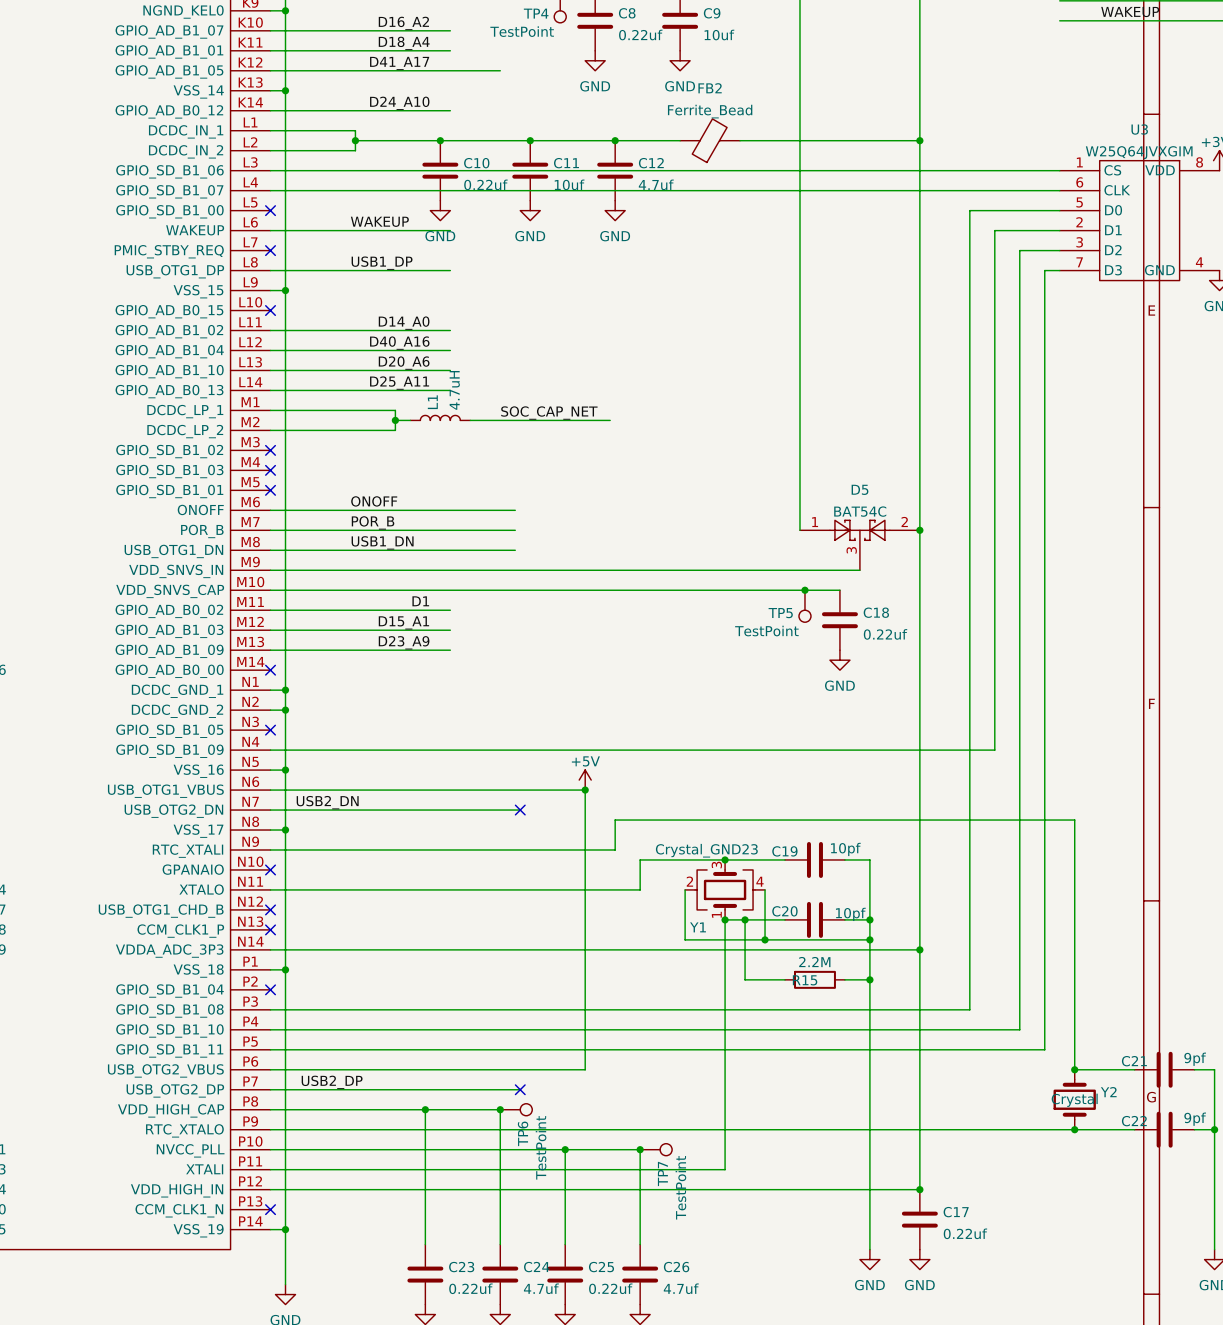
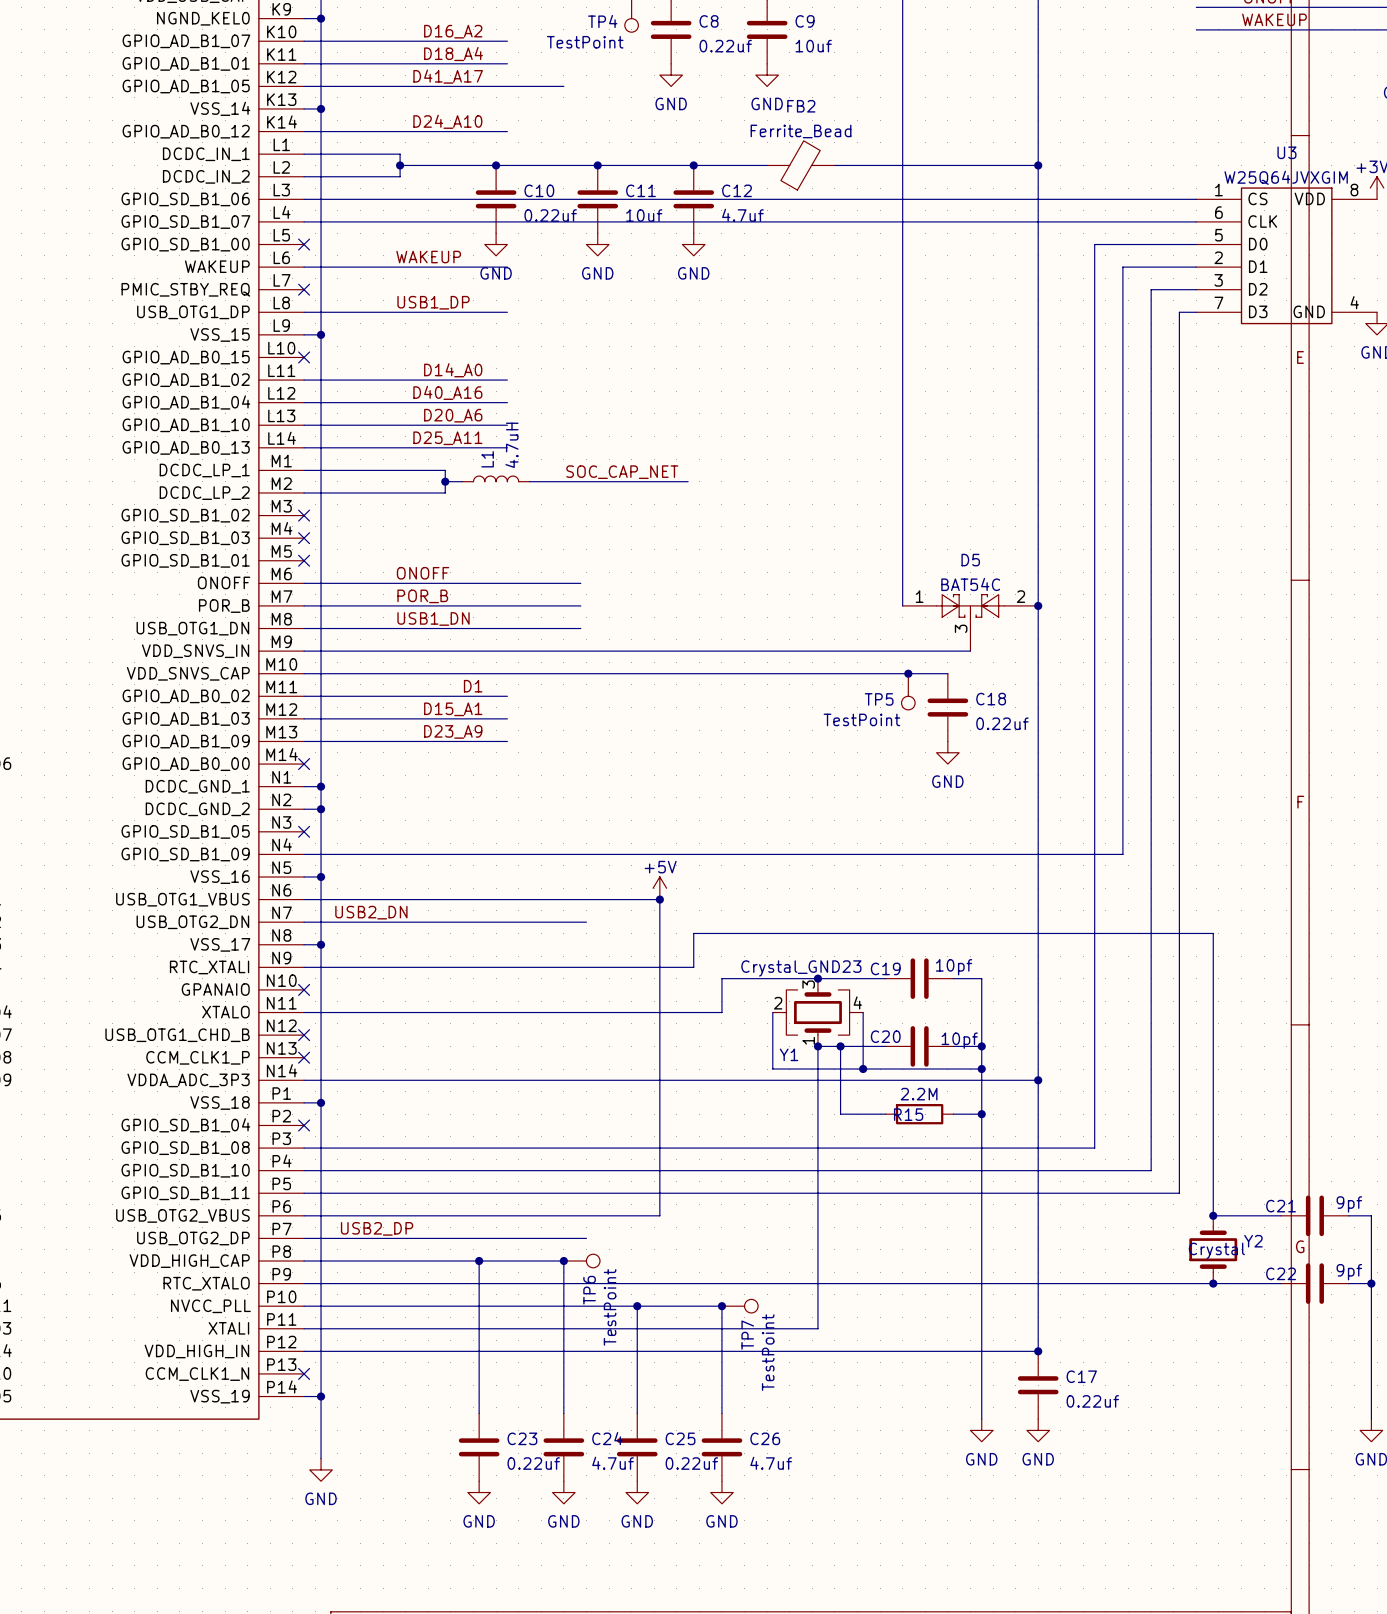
no-connect mark: (520, 810) -> none
no-connect mark: (520, 1089) -> none

